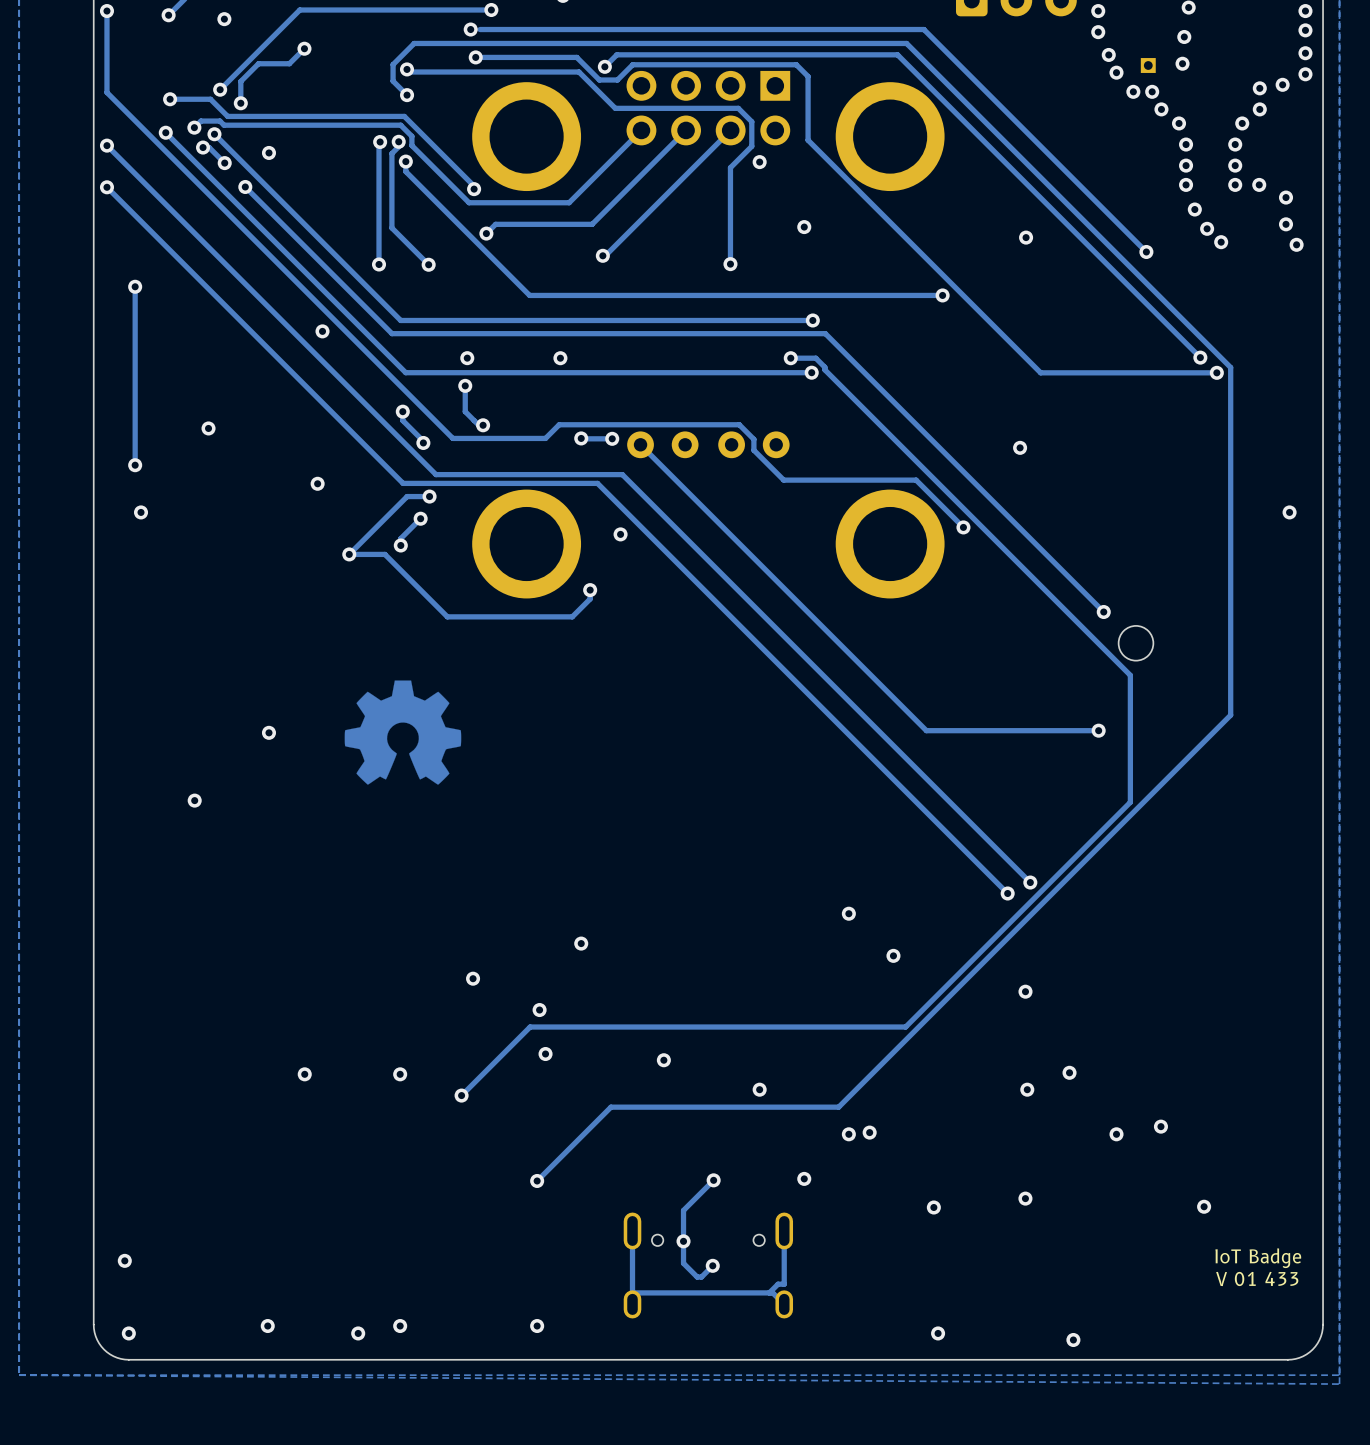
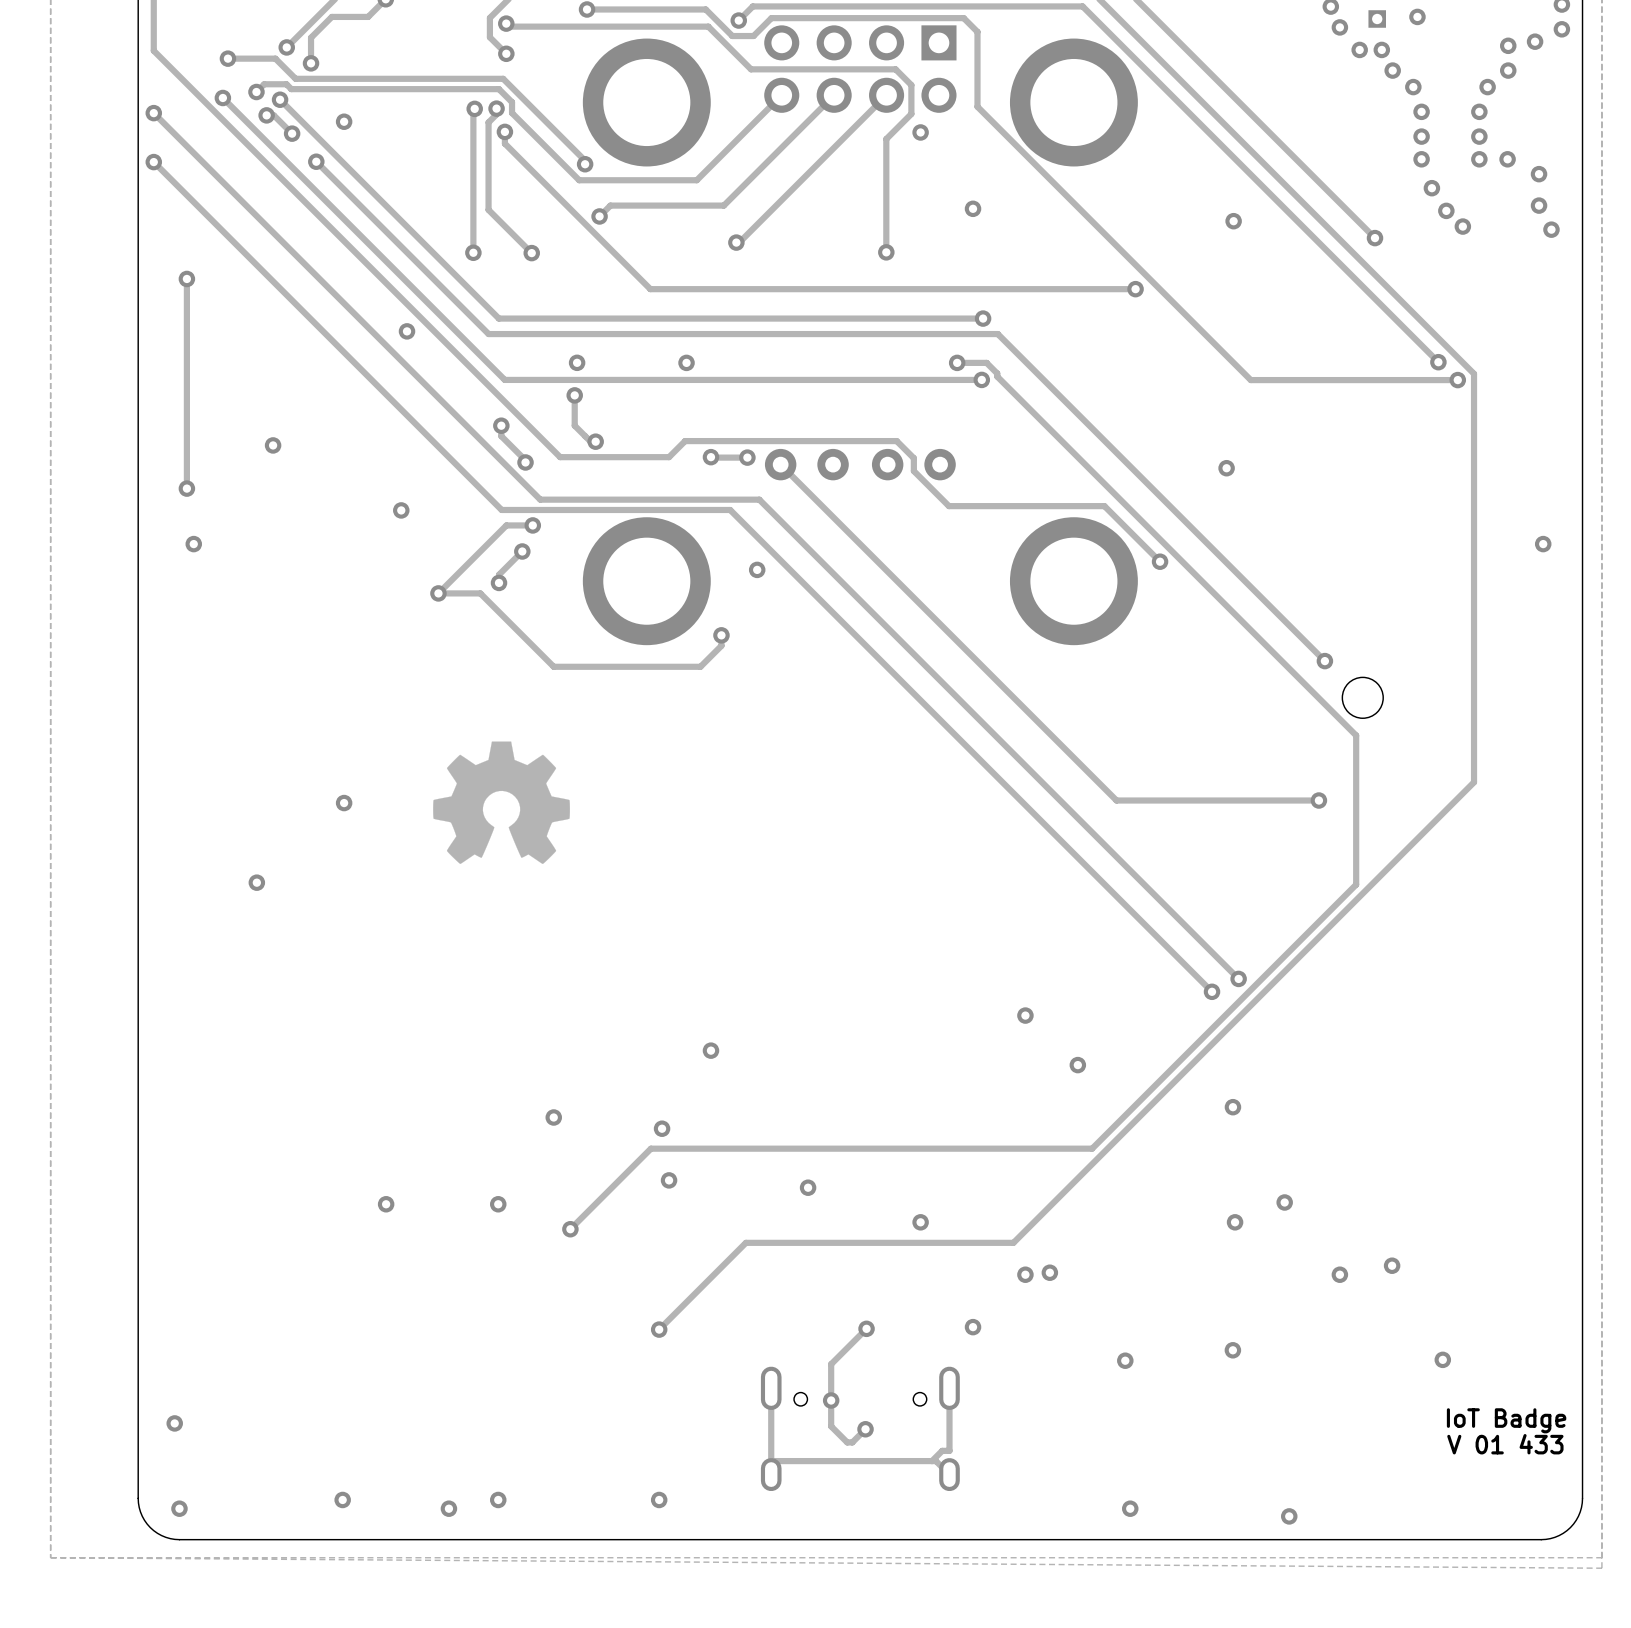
via position: (473, 978) -> (553, 1117)

